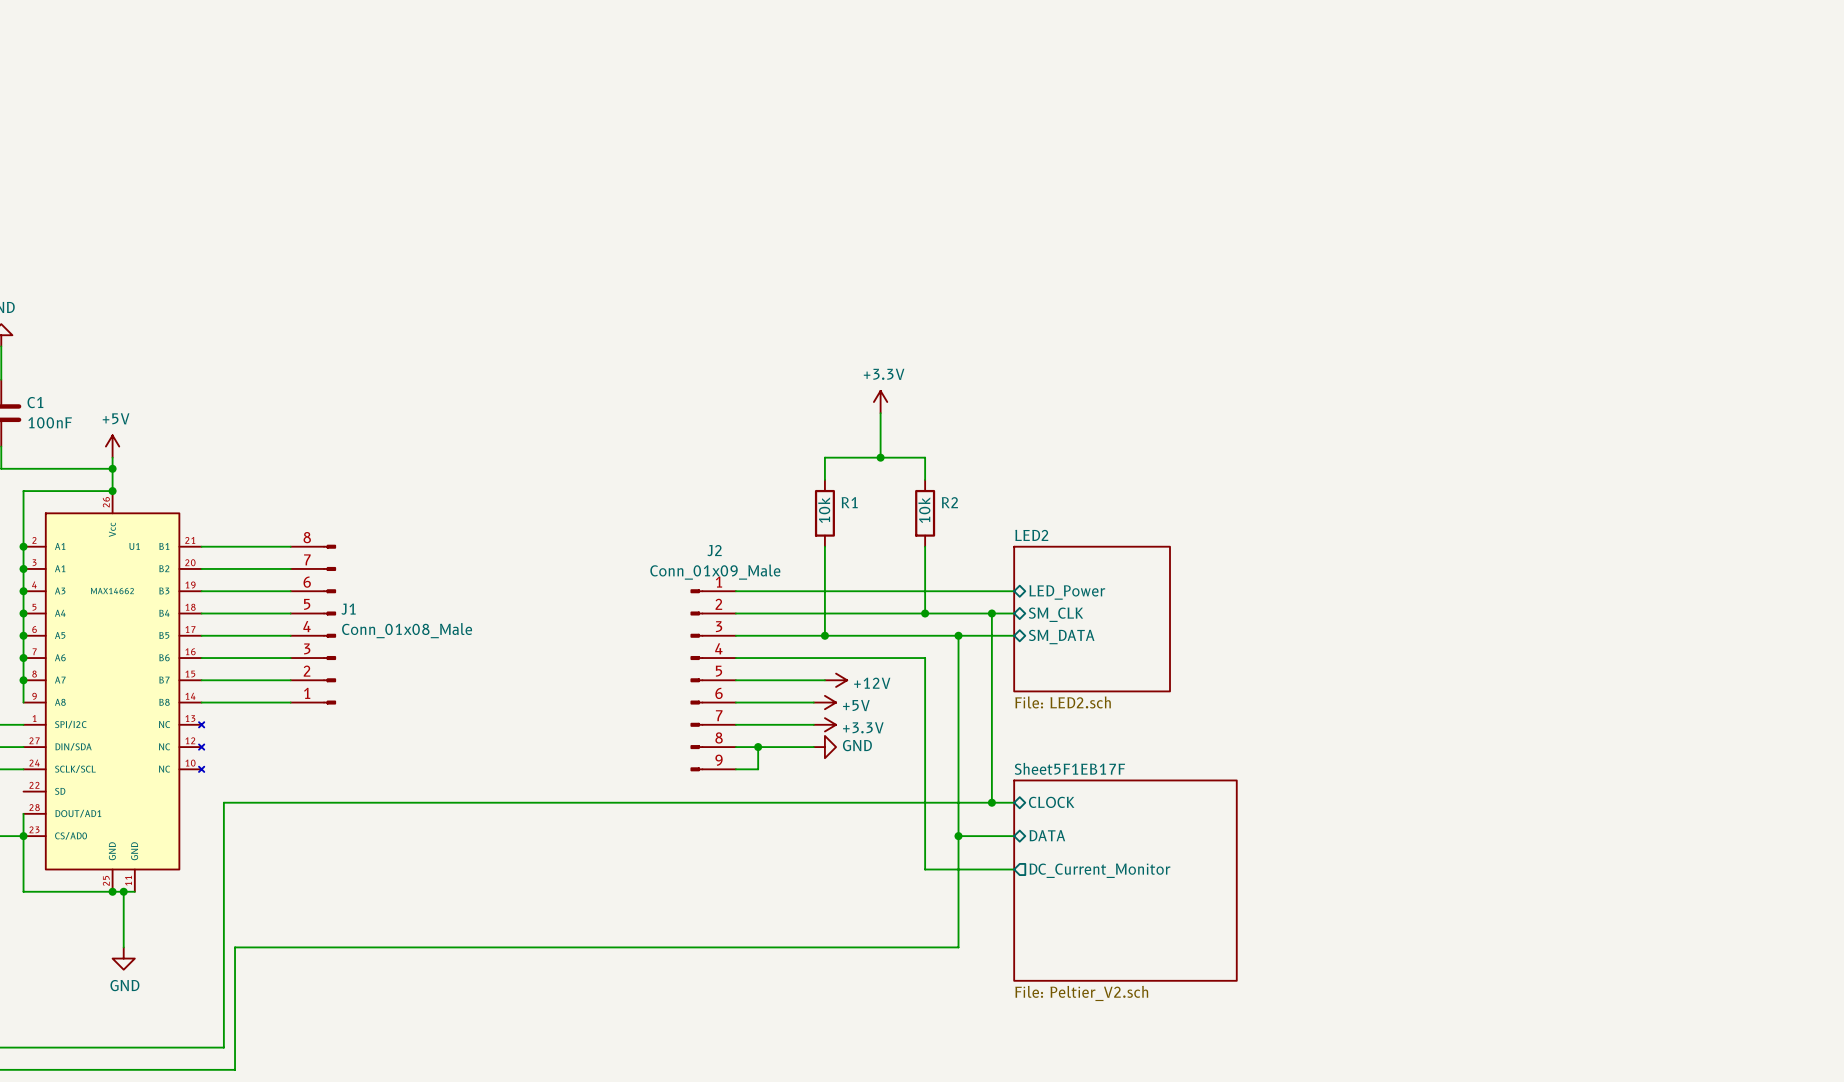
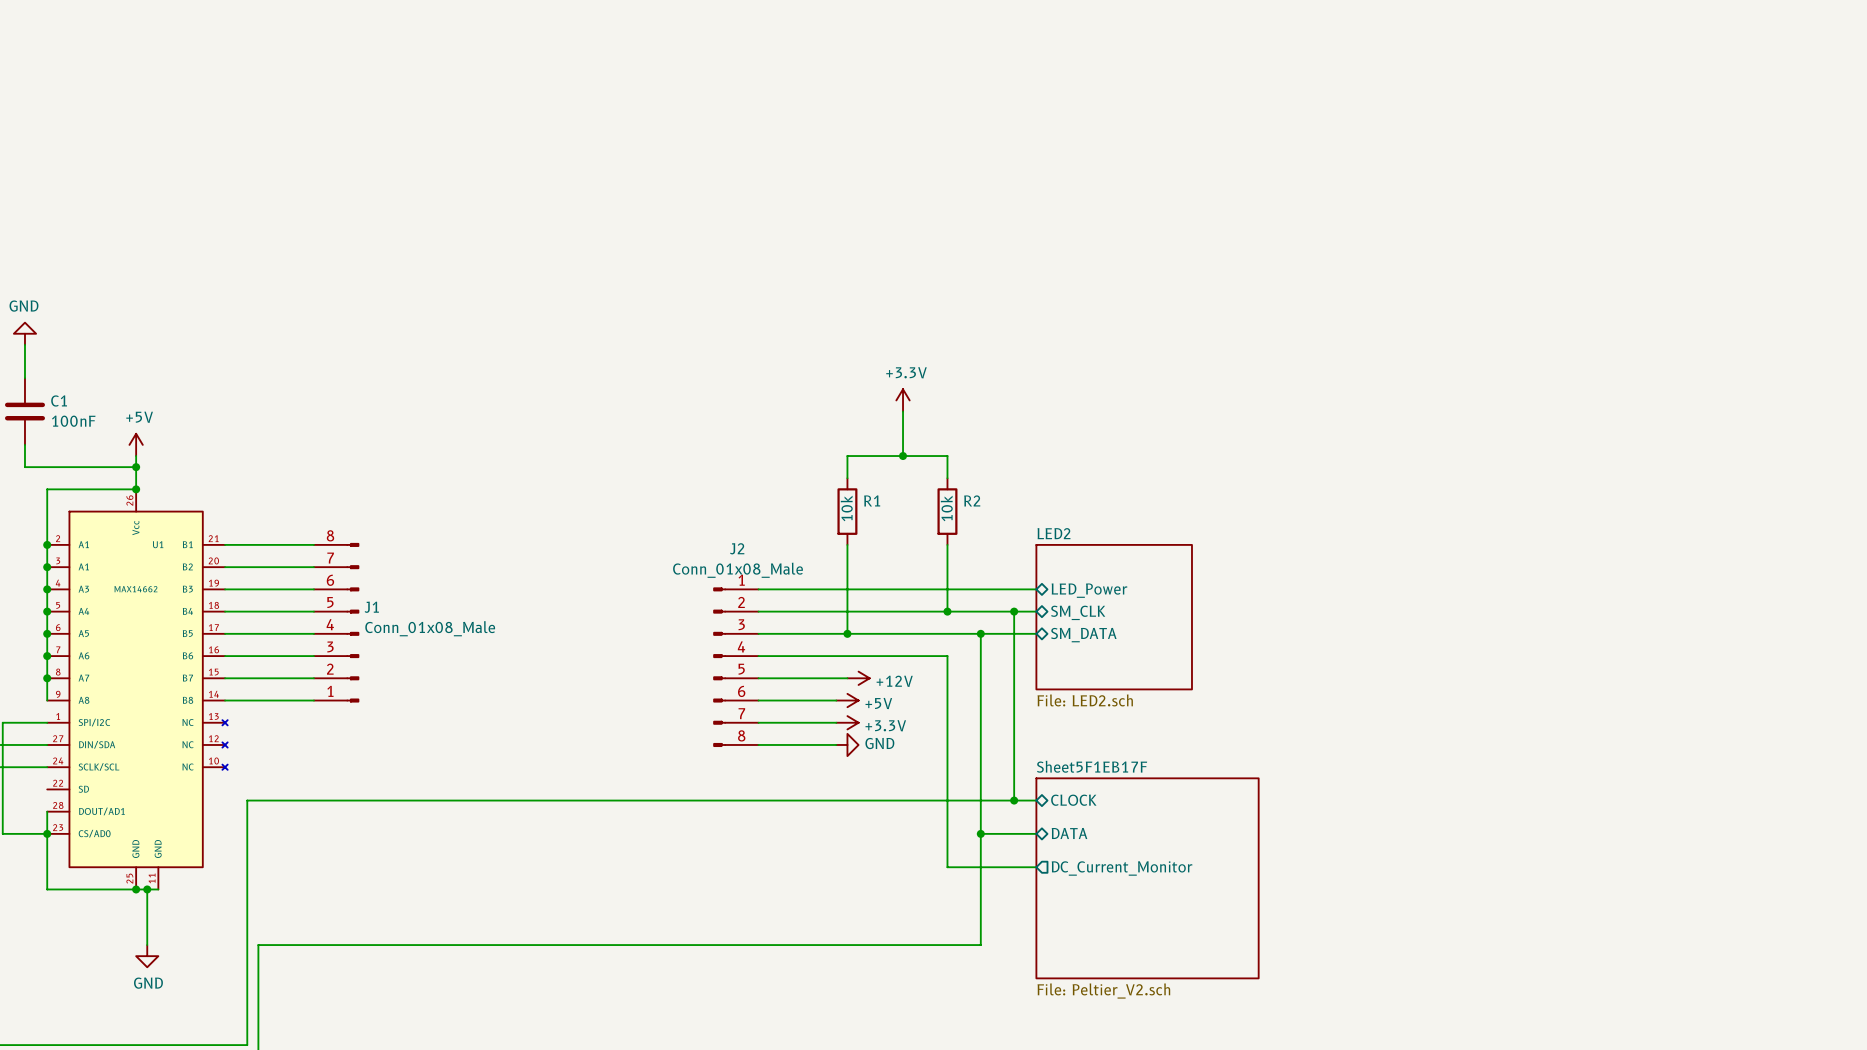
J2 value: Conn_01x09_Male (715, 572) -> Conn_01x08_Male (738, 570)
J2 symbol: [690, 589, 736, 772] -> [713, 587, 759, 747]
wire: (758, 747) (758, 769) (735, 769) -> none
junction: (758, 747) -> none

